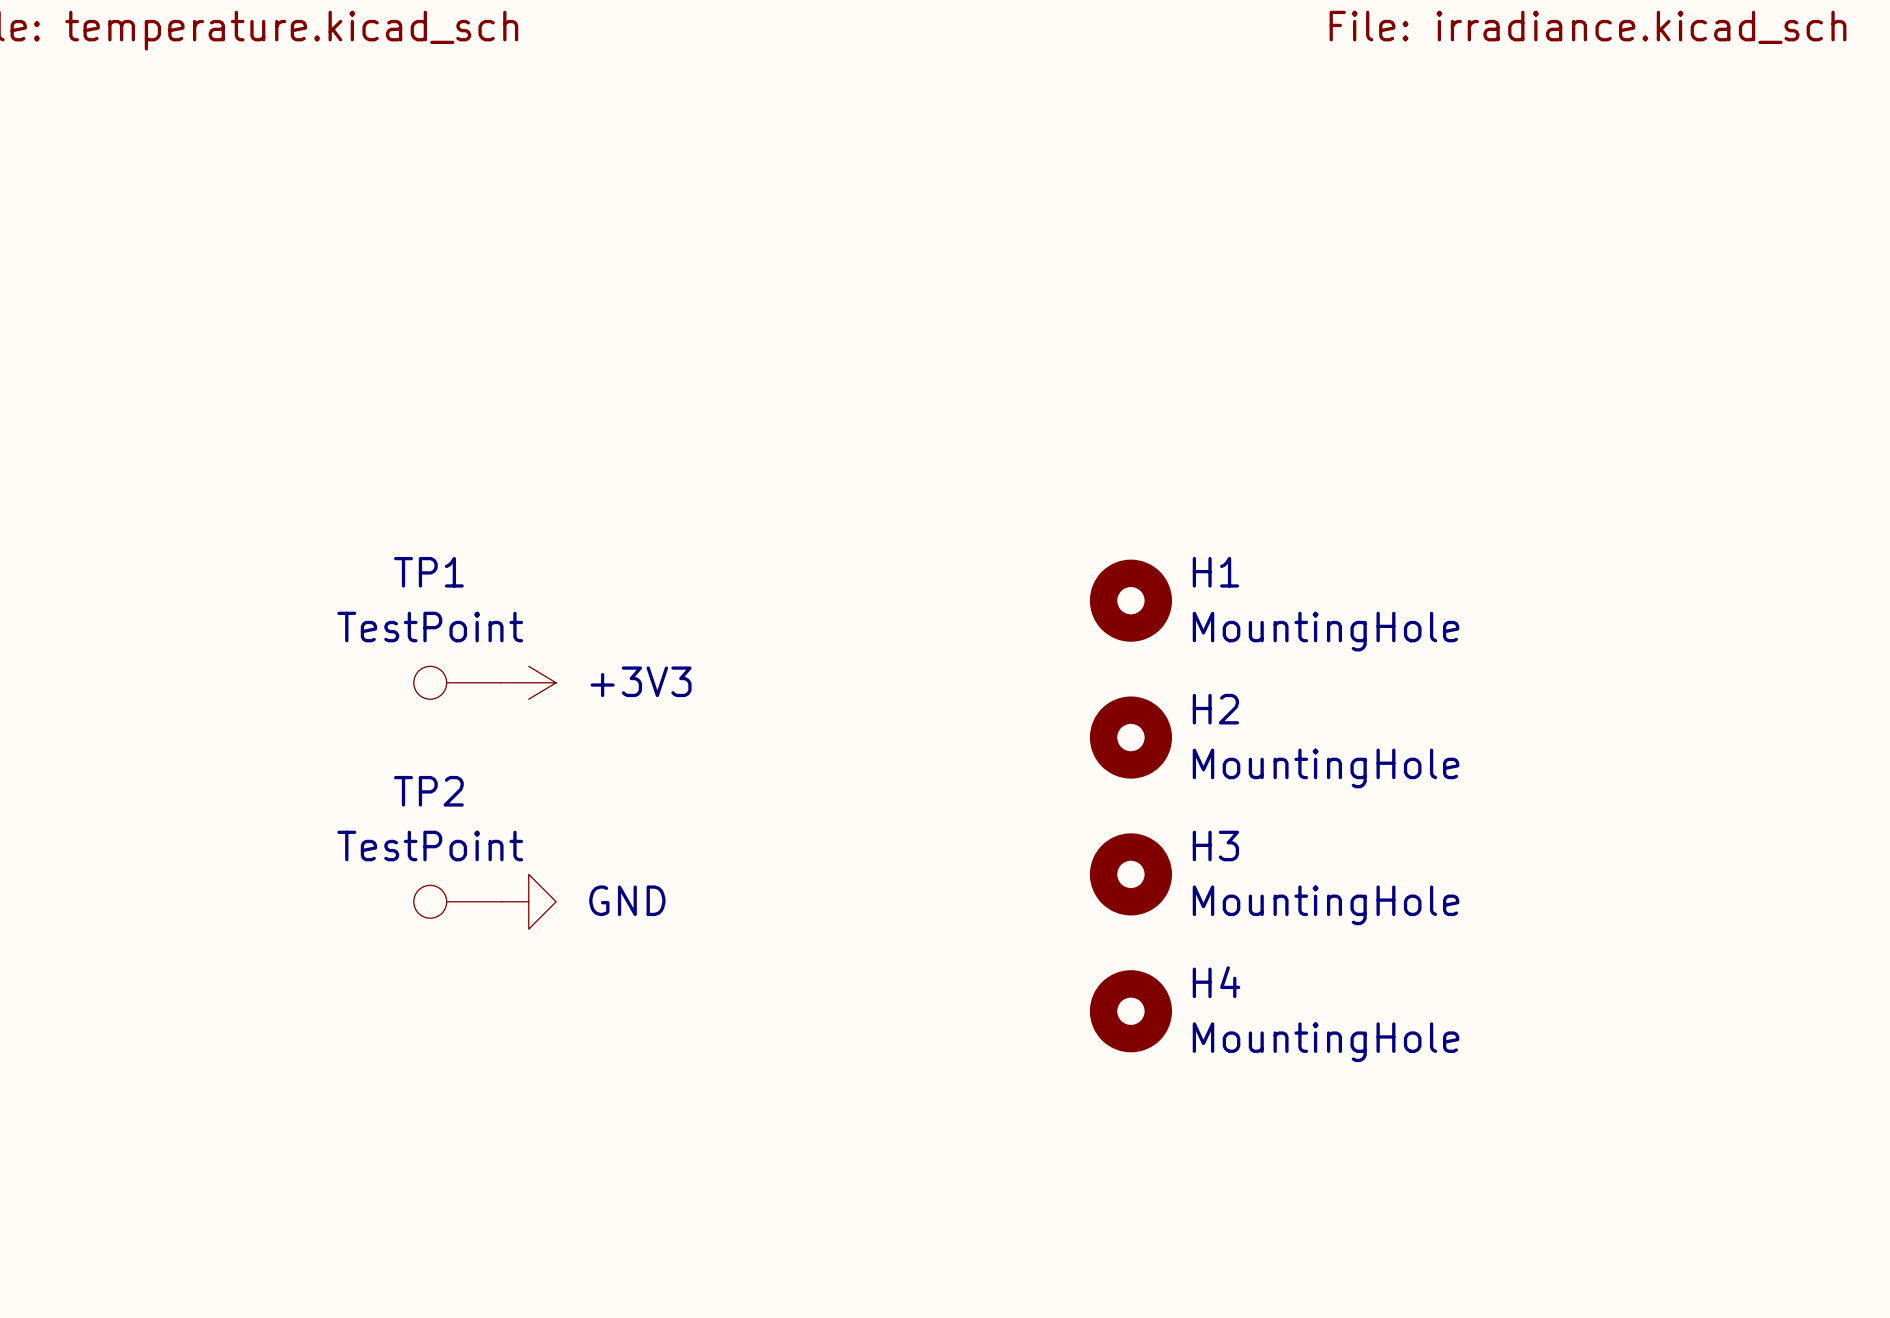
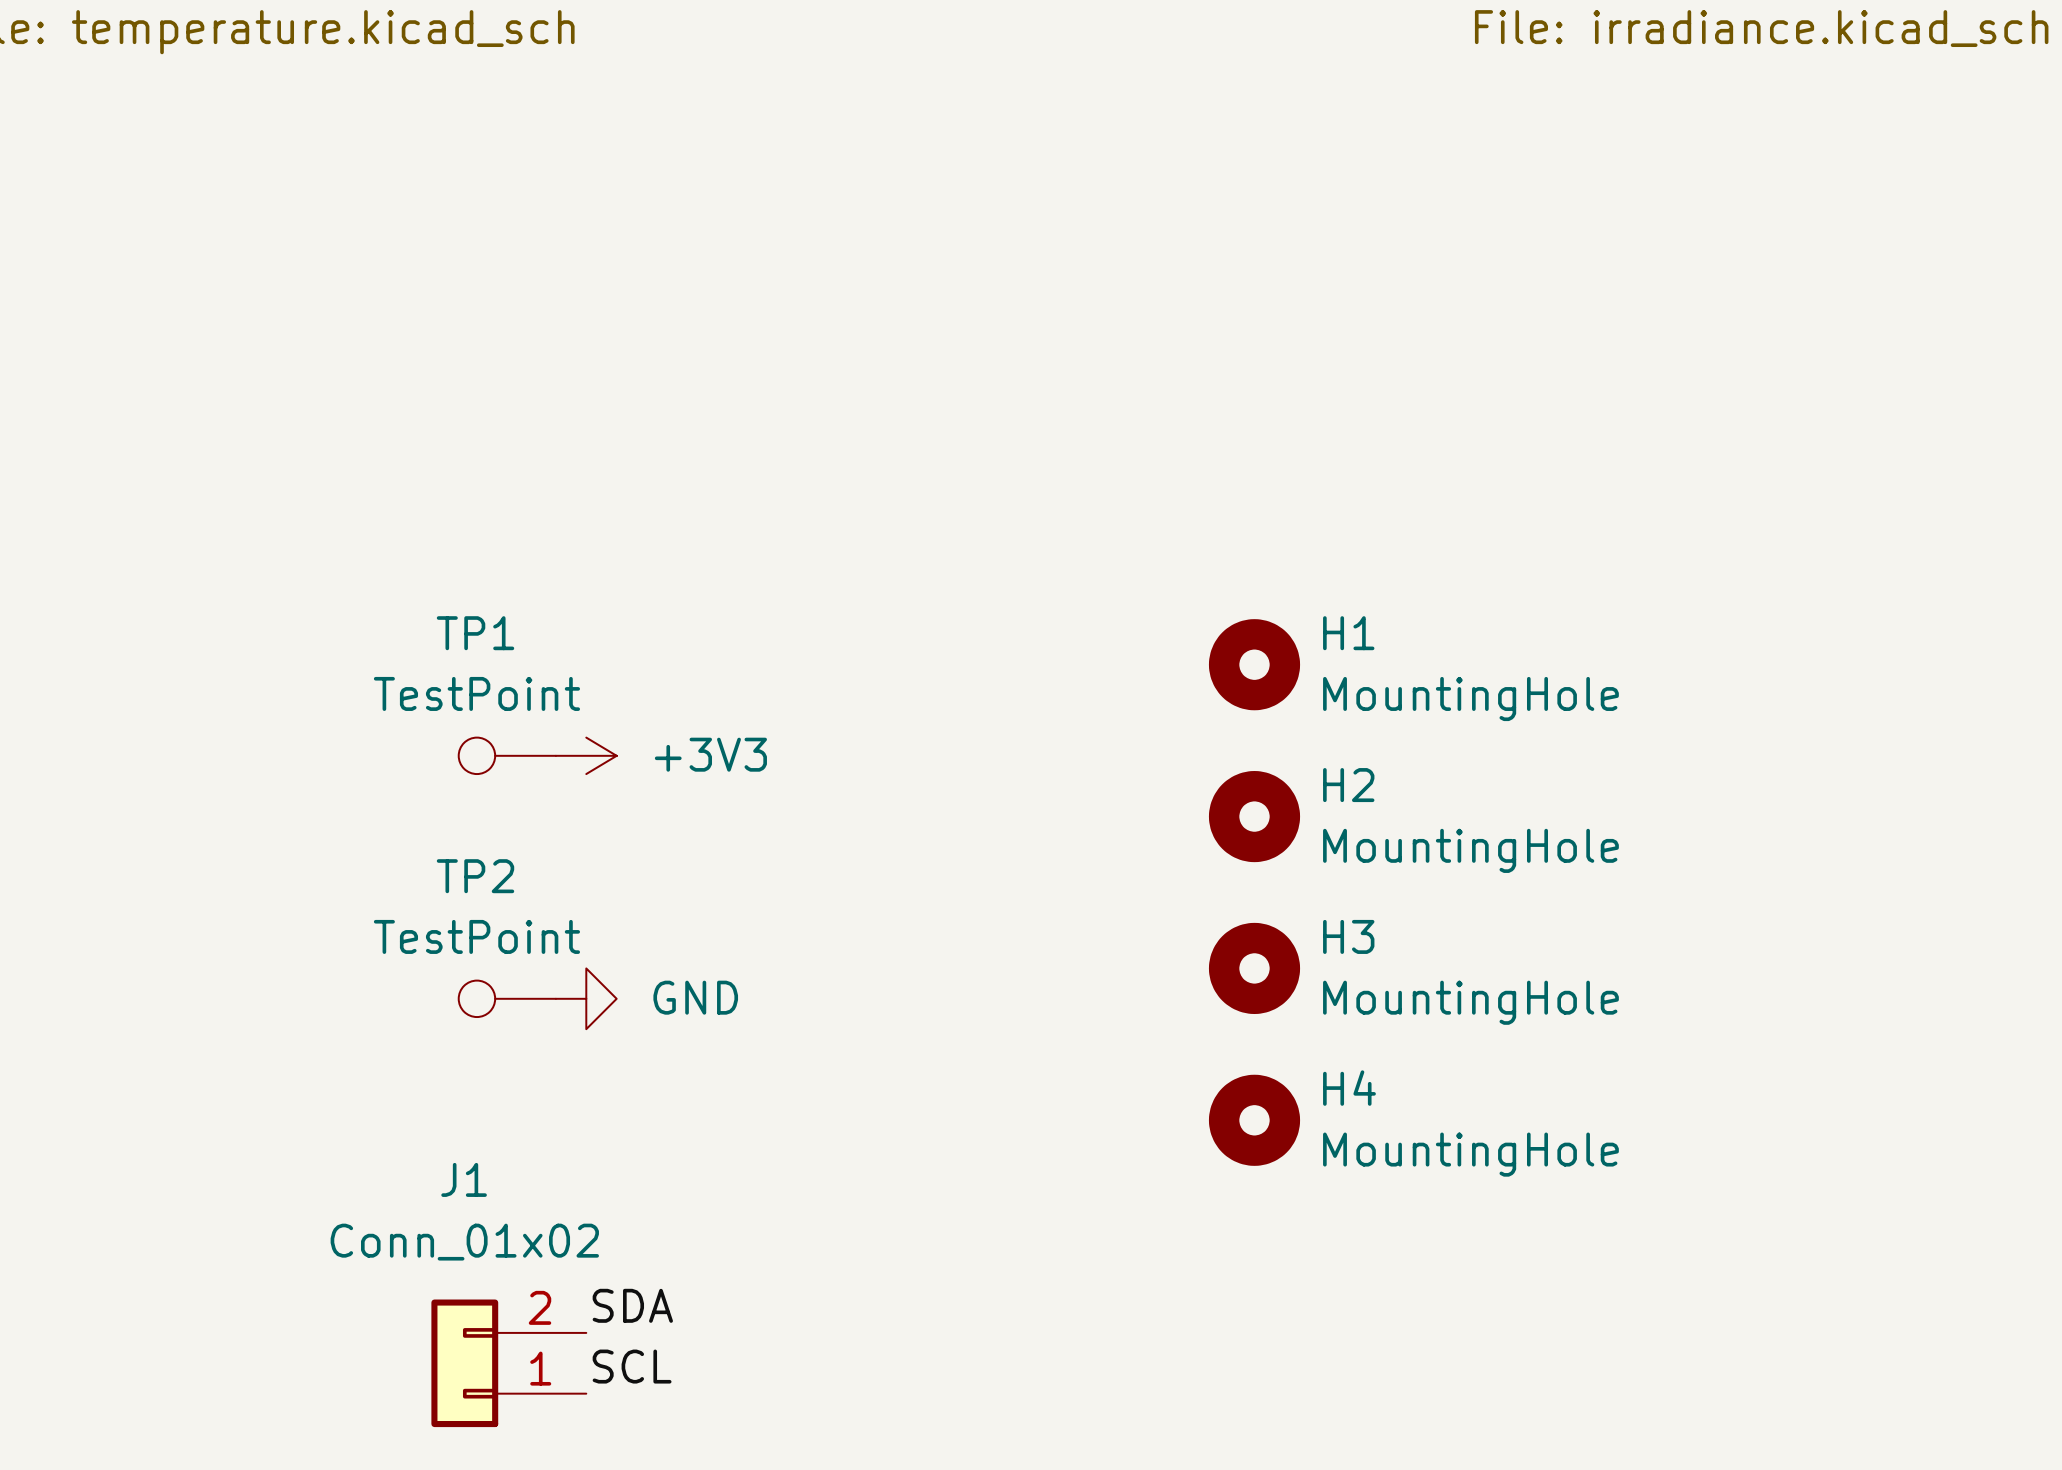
label: none -> SDA (632, 1305)
J1: none -> Conn_01x02 (508, 1363)
label: none -> SCL (632, 1366)

